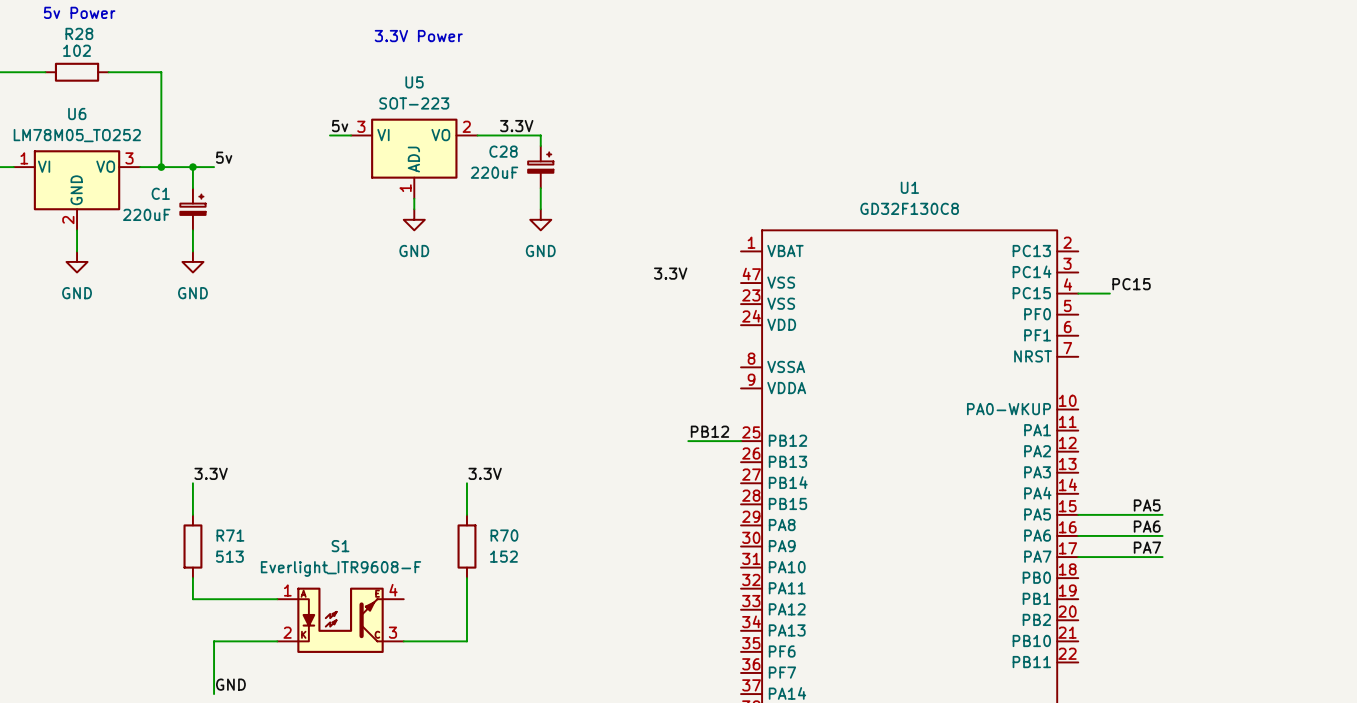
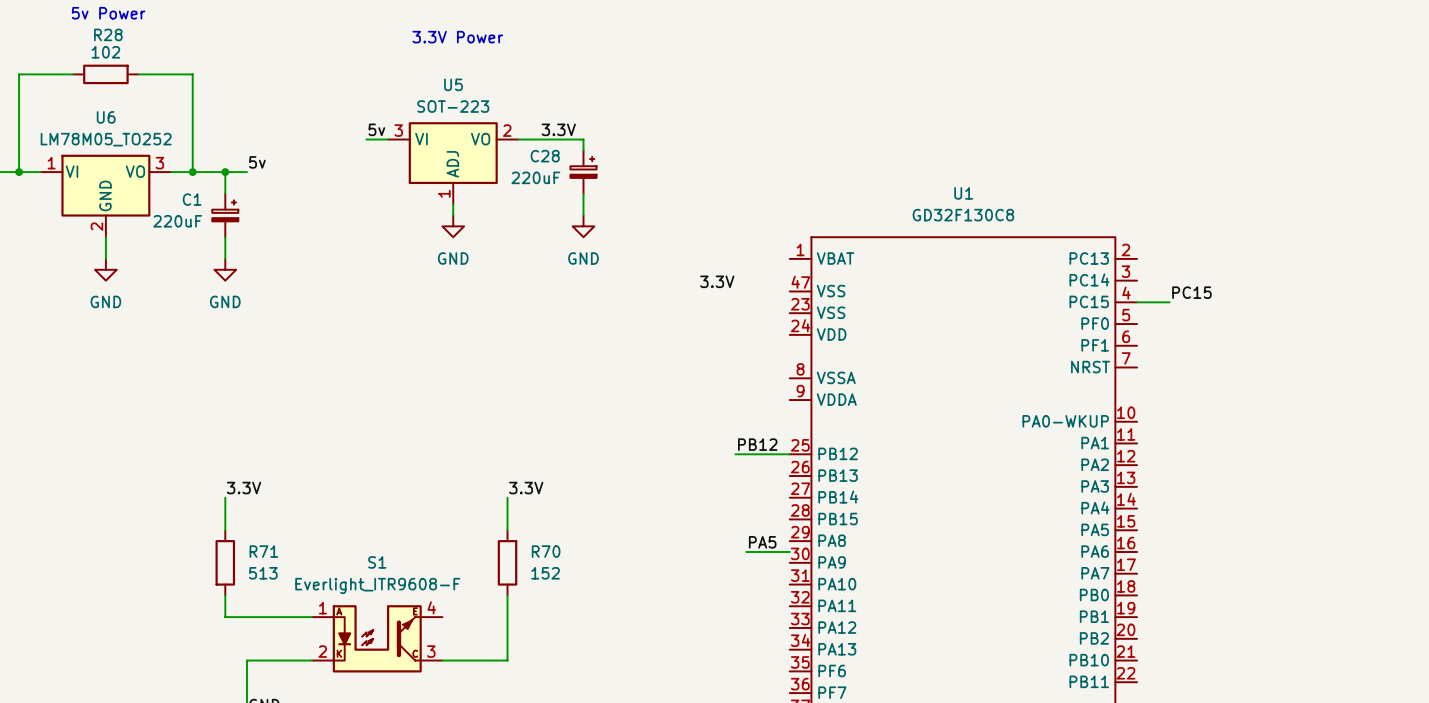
label: PA5 (1147, 505) -> none
wire: (1078, 514) (1162, 514) -> none
label: none -> PA5 (762, 542)
label: PA6 (1147, 526) -> none
wire: none -> (746, 551) (789, 551)
wire: (1078, 535) (1162, 535) -> none
label: PA7 (1147, 547) -> none
wire: (1078, 557) (1162, 557) -> none

